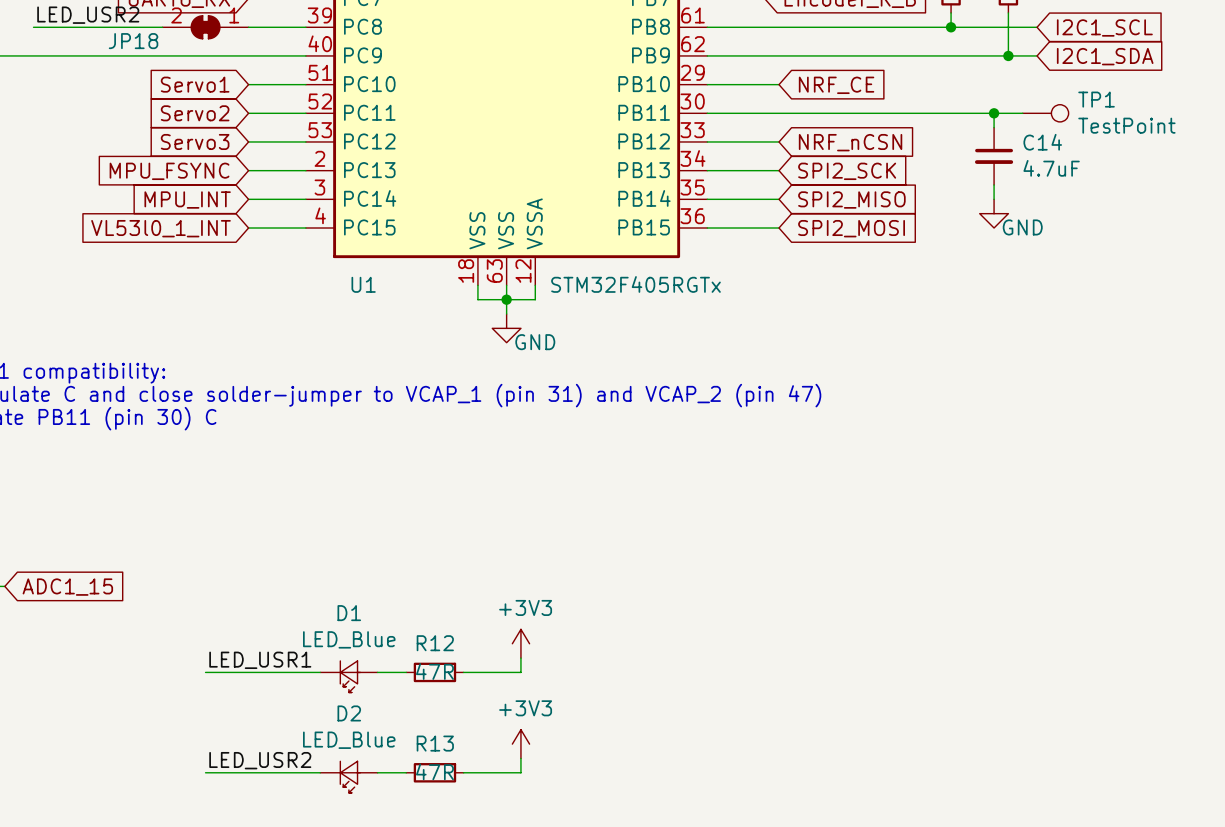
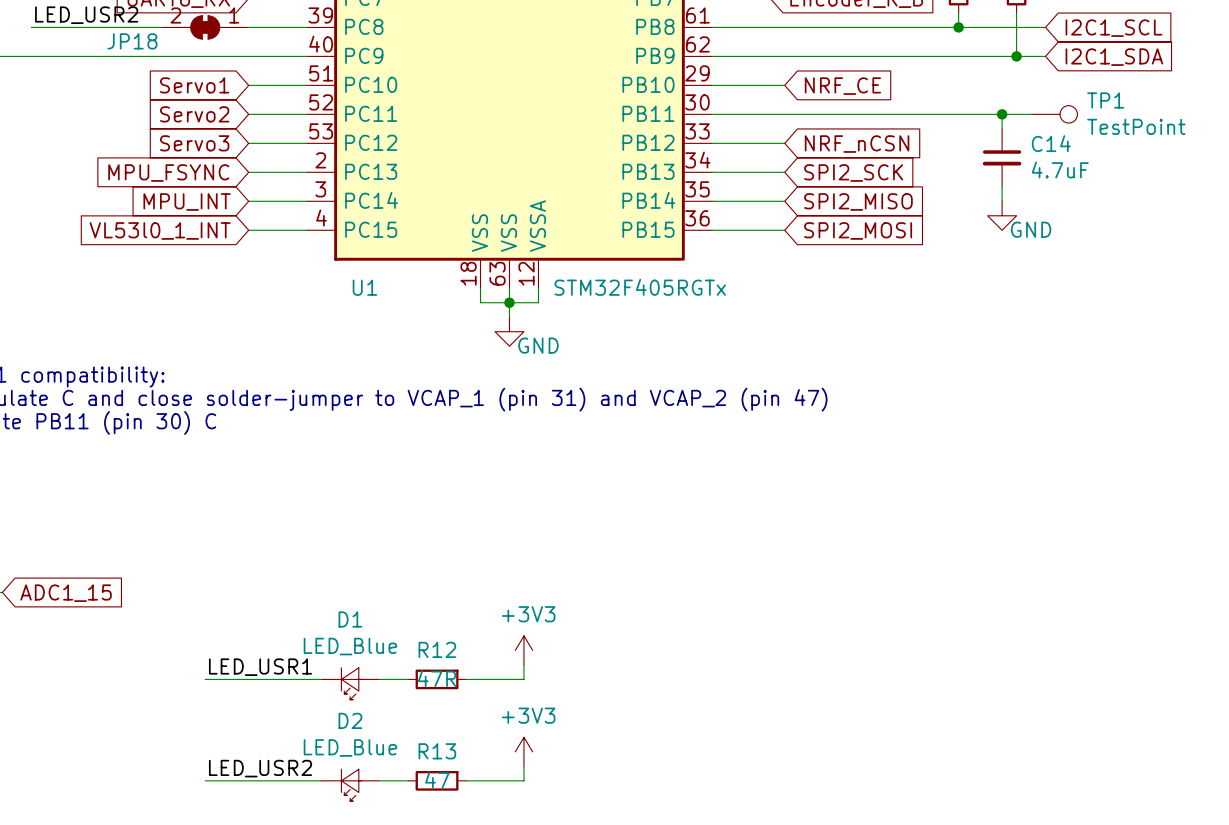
R13 value: 47R (434, 771) -> 47 (437, 779)

